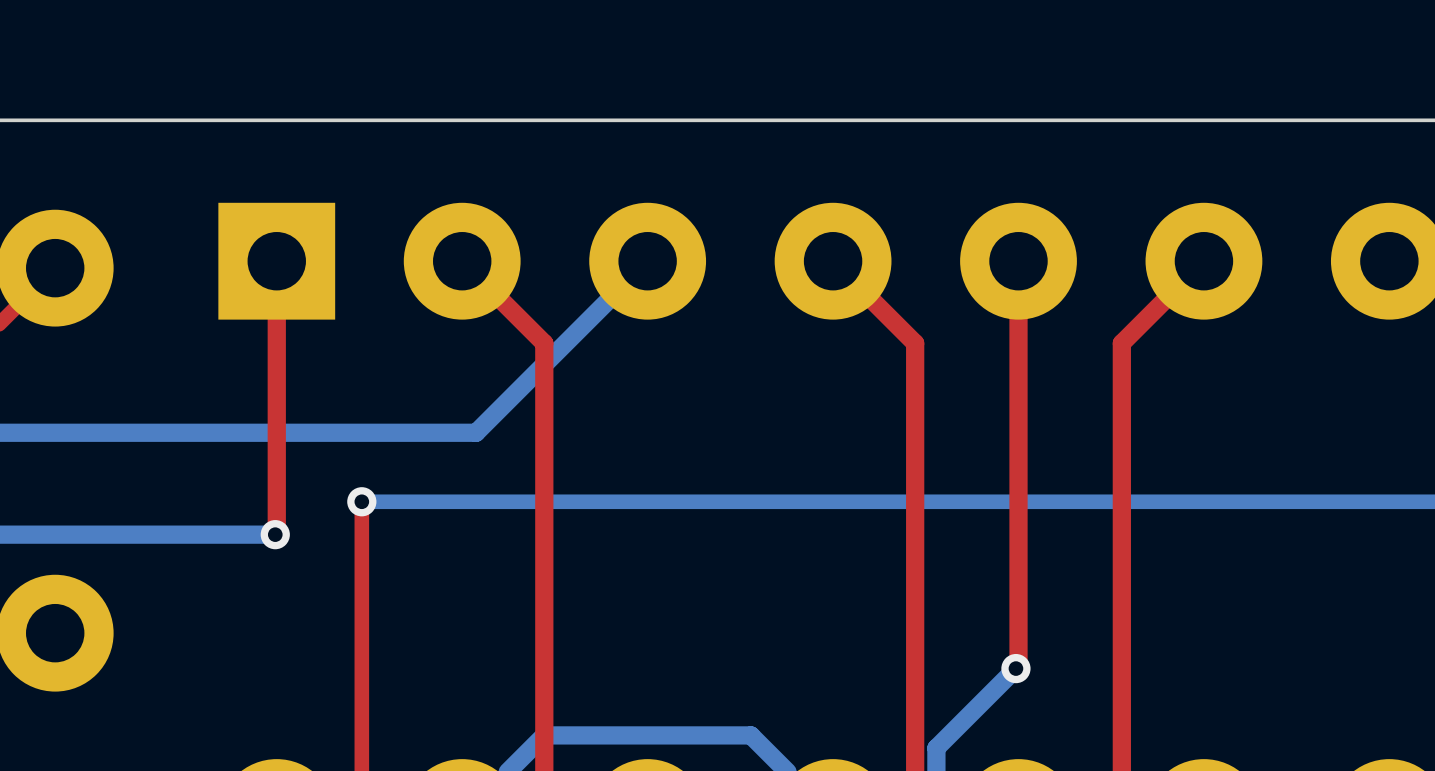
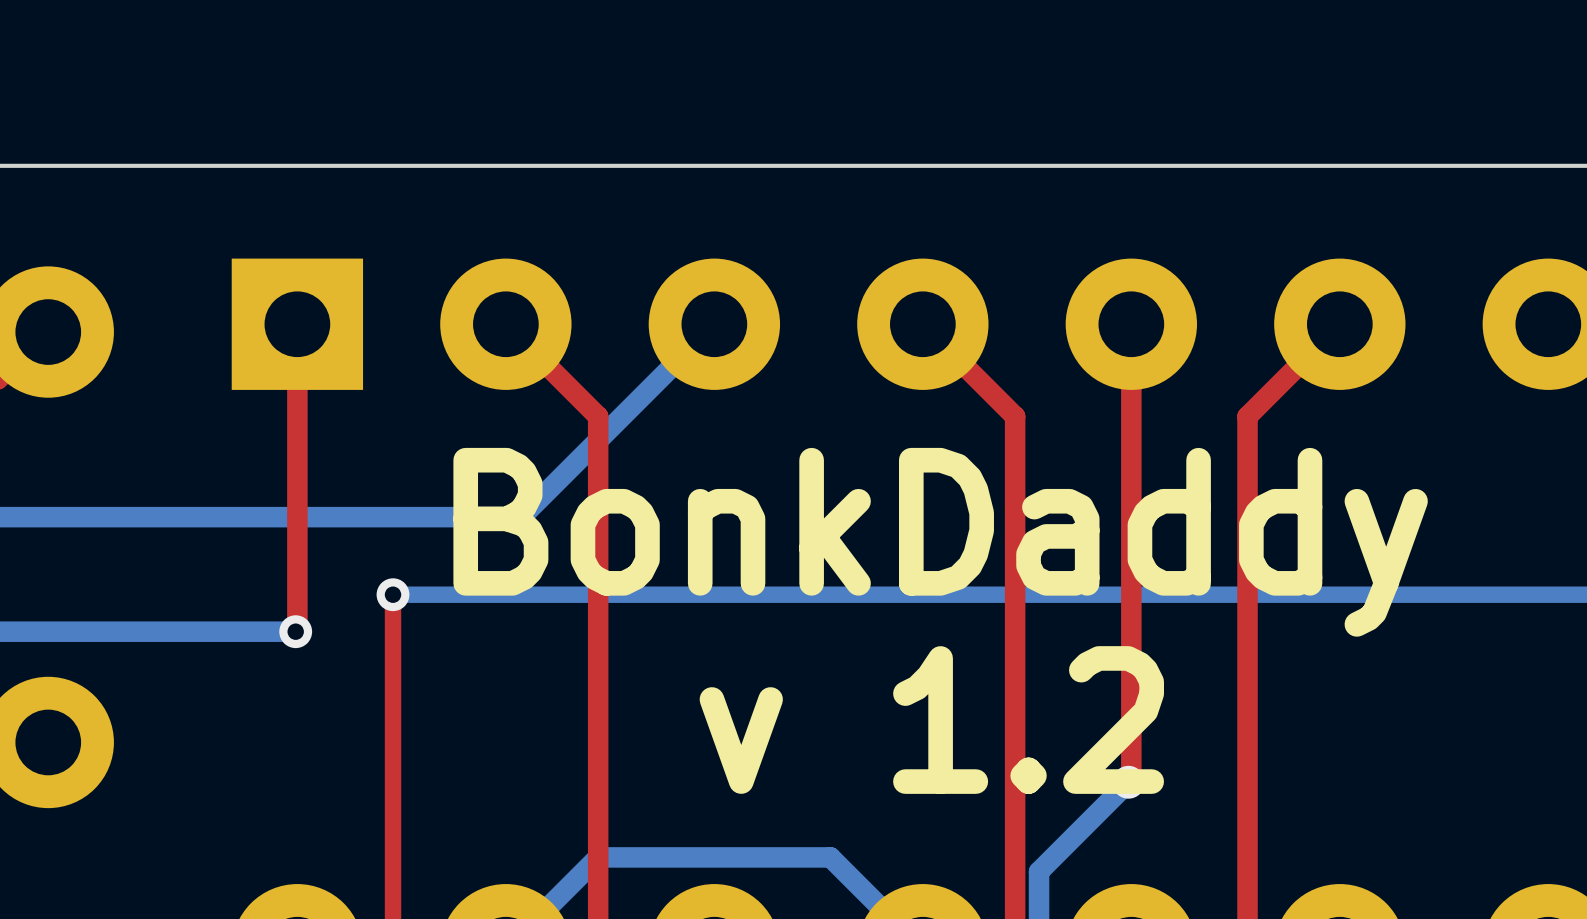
text: none -> BonkDaddy (940, 542)
text: none -> v 1.2 (931, 720)

